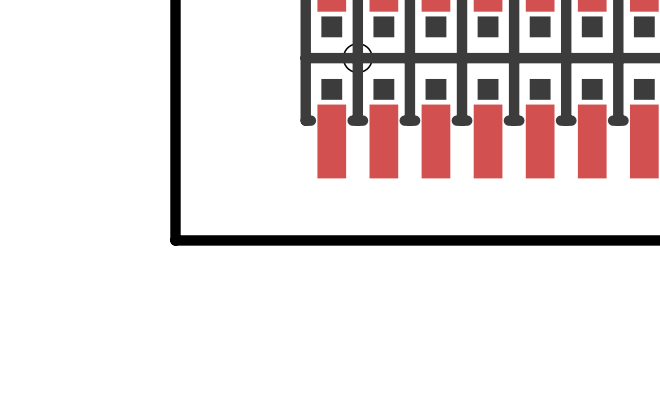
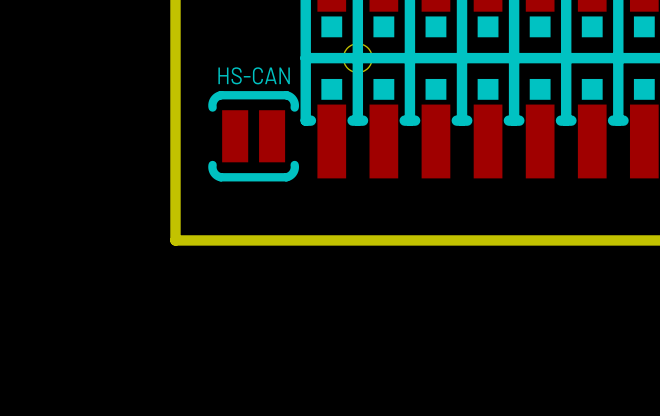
HS-CAN: none -> (253, 136)

